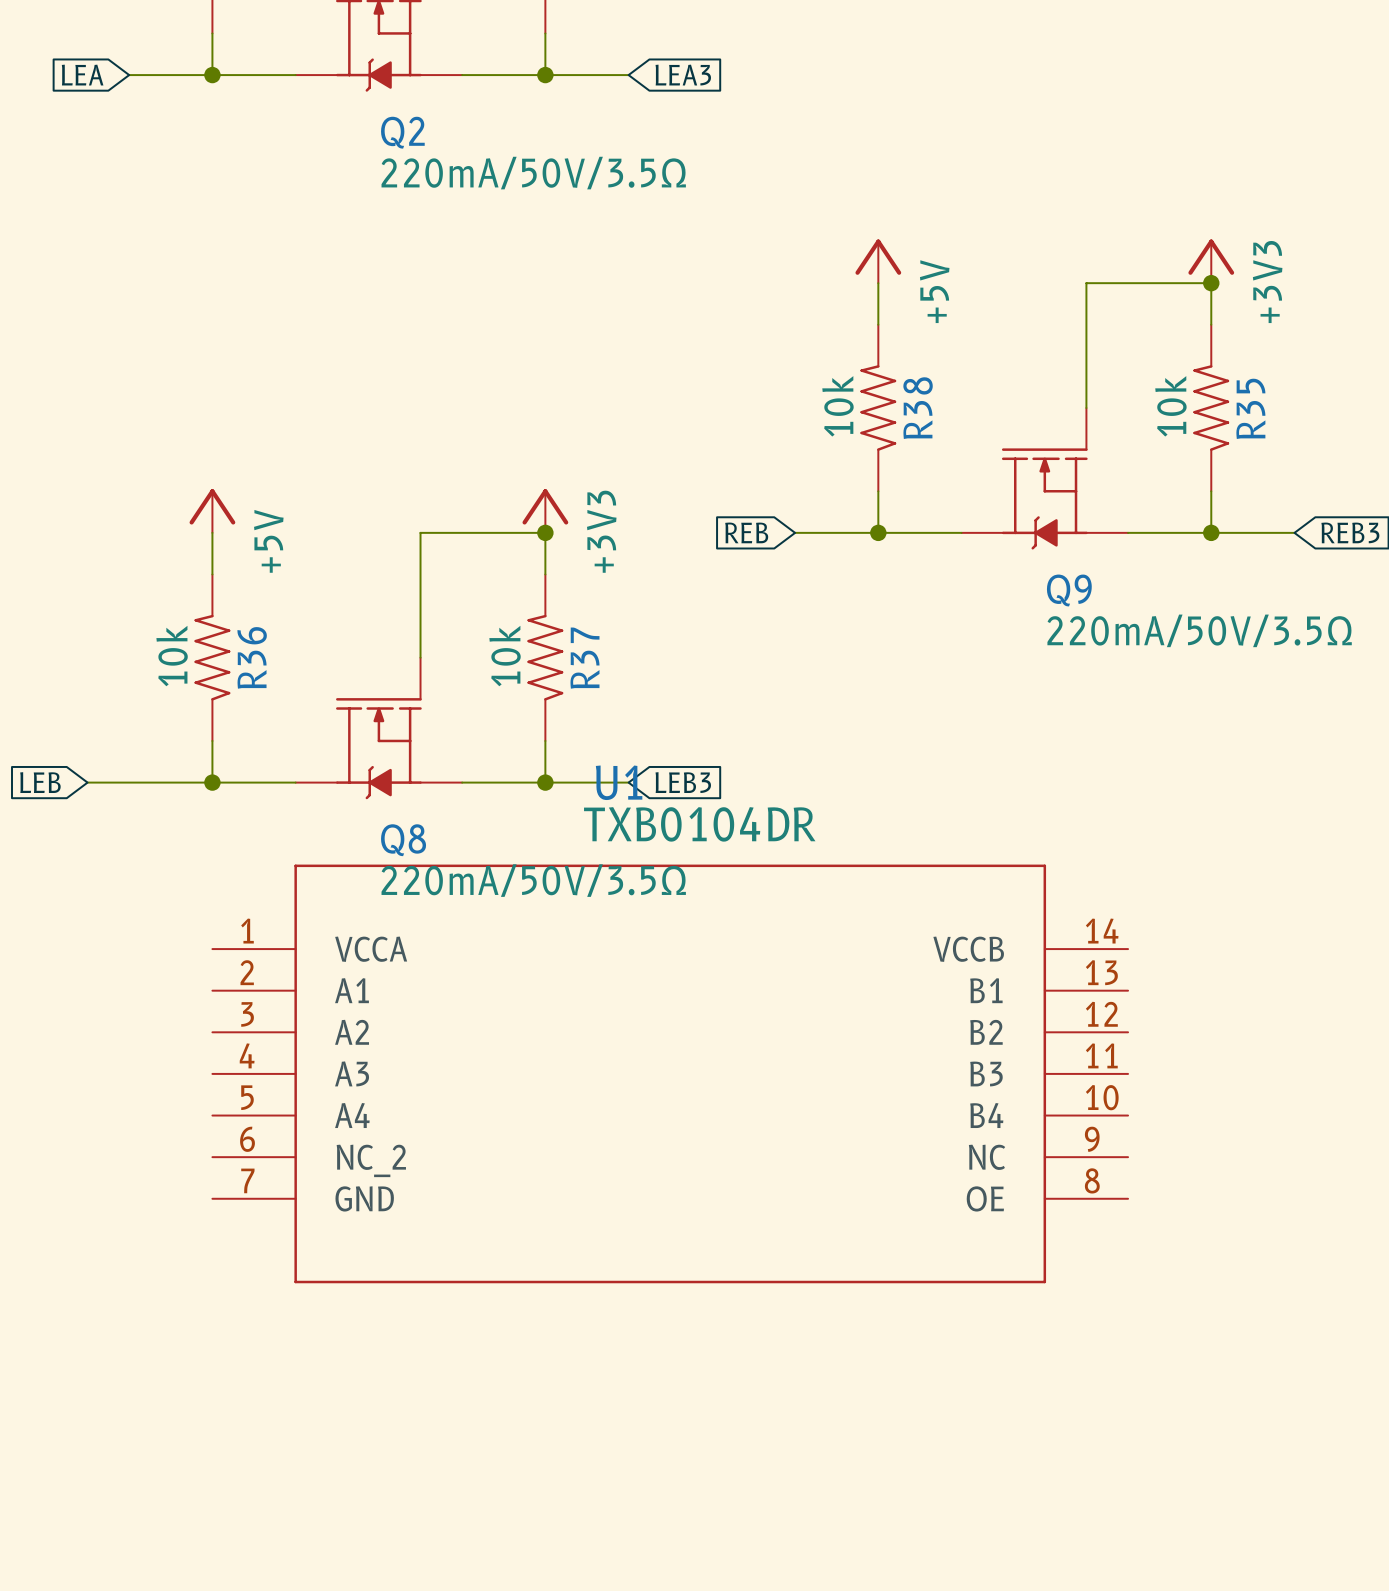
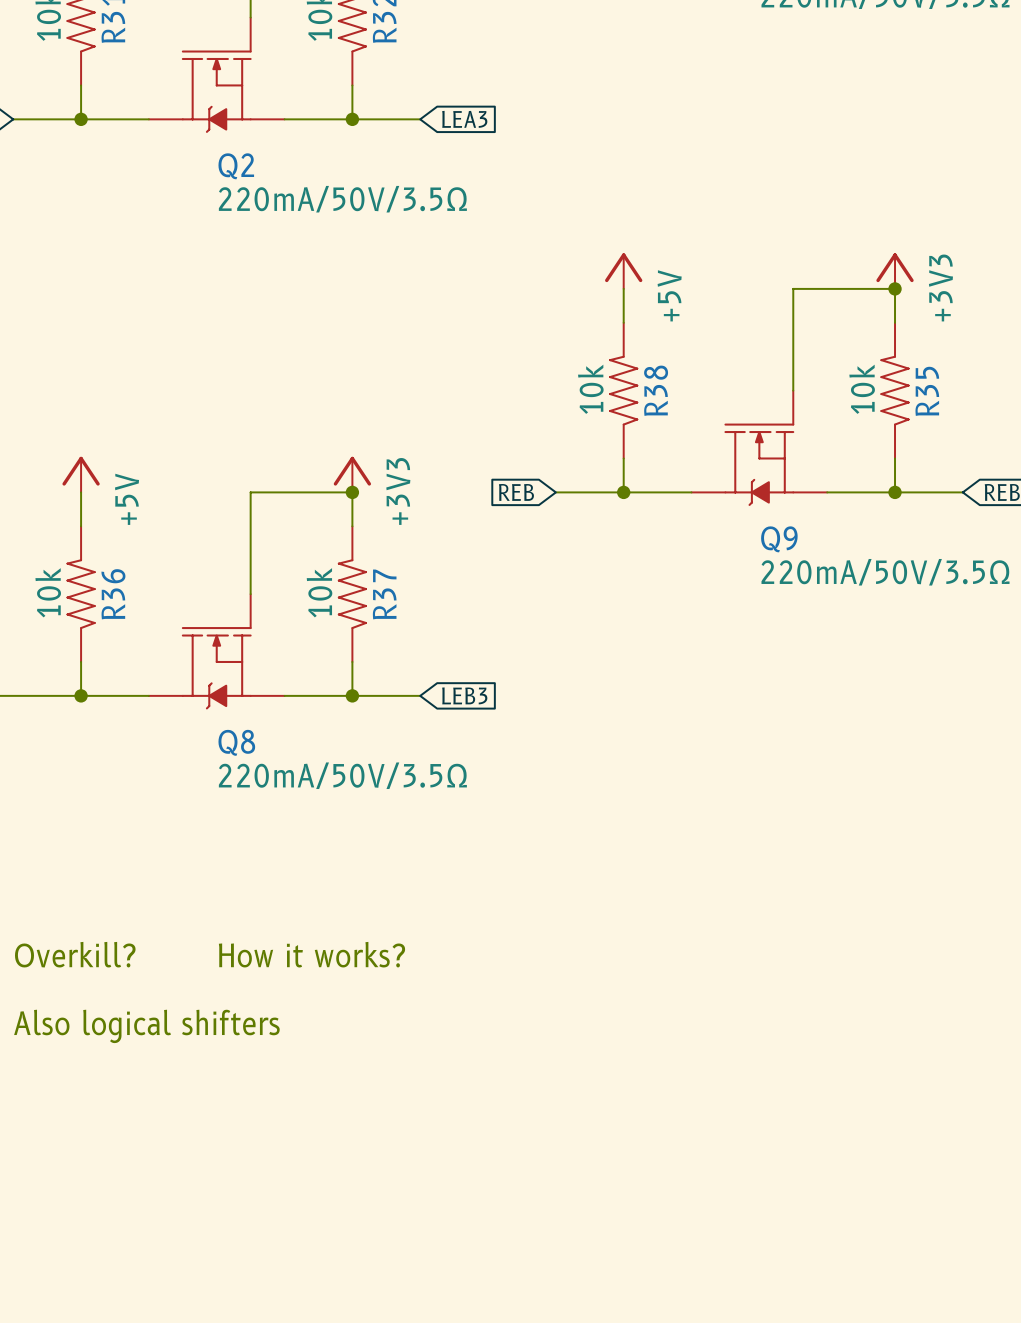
U1: TXB0104DR (670, 1073) -> none
text: none -> Overkill? (75, 954)
text: none -> How it works? (311, 954)
text: none -> Also logical shifters (146, 1026)

